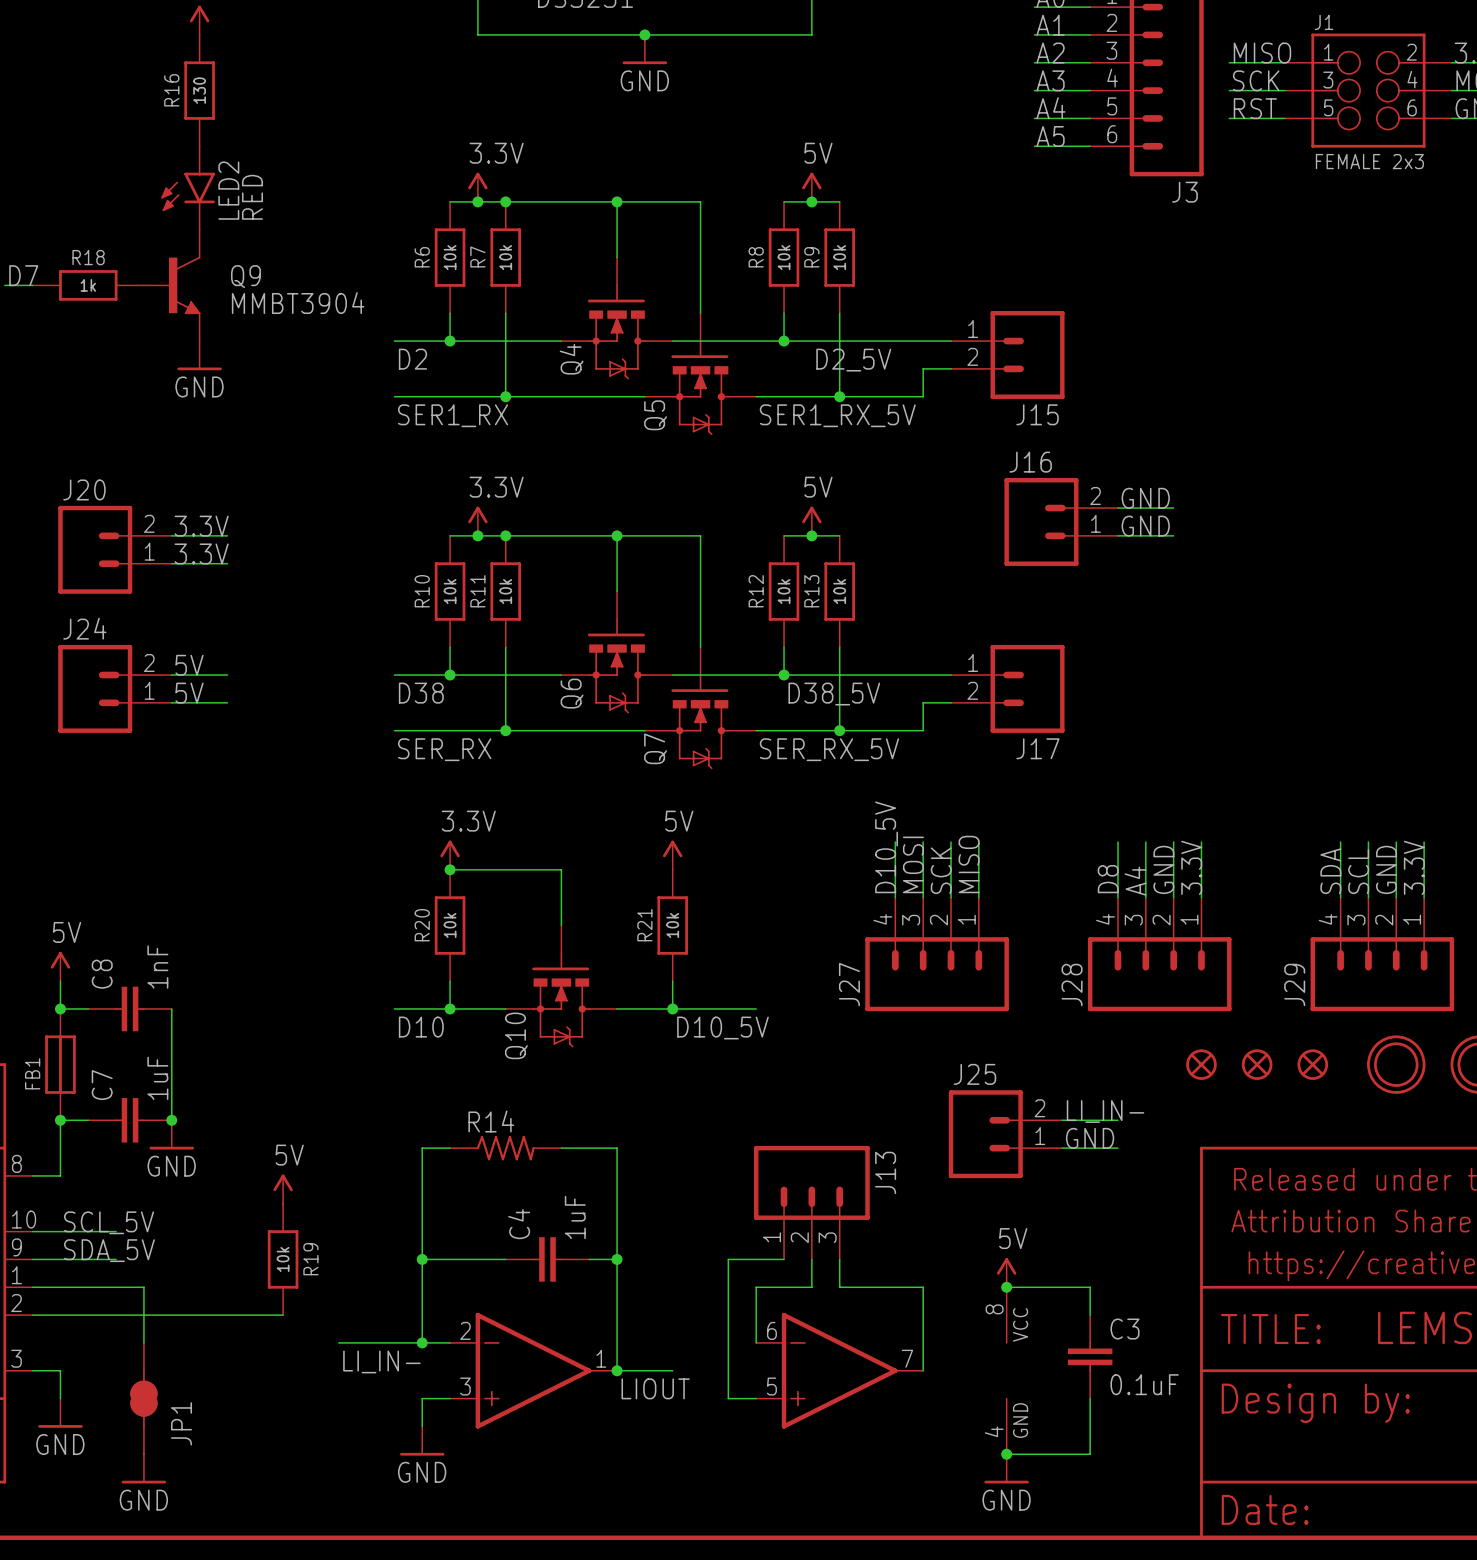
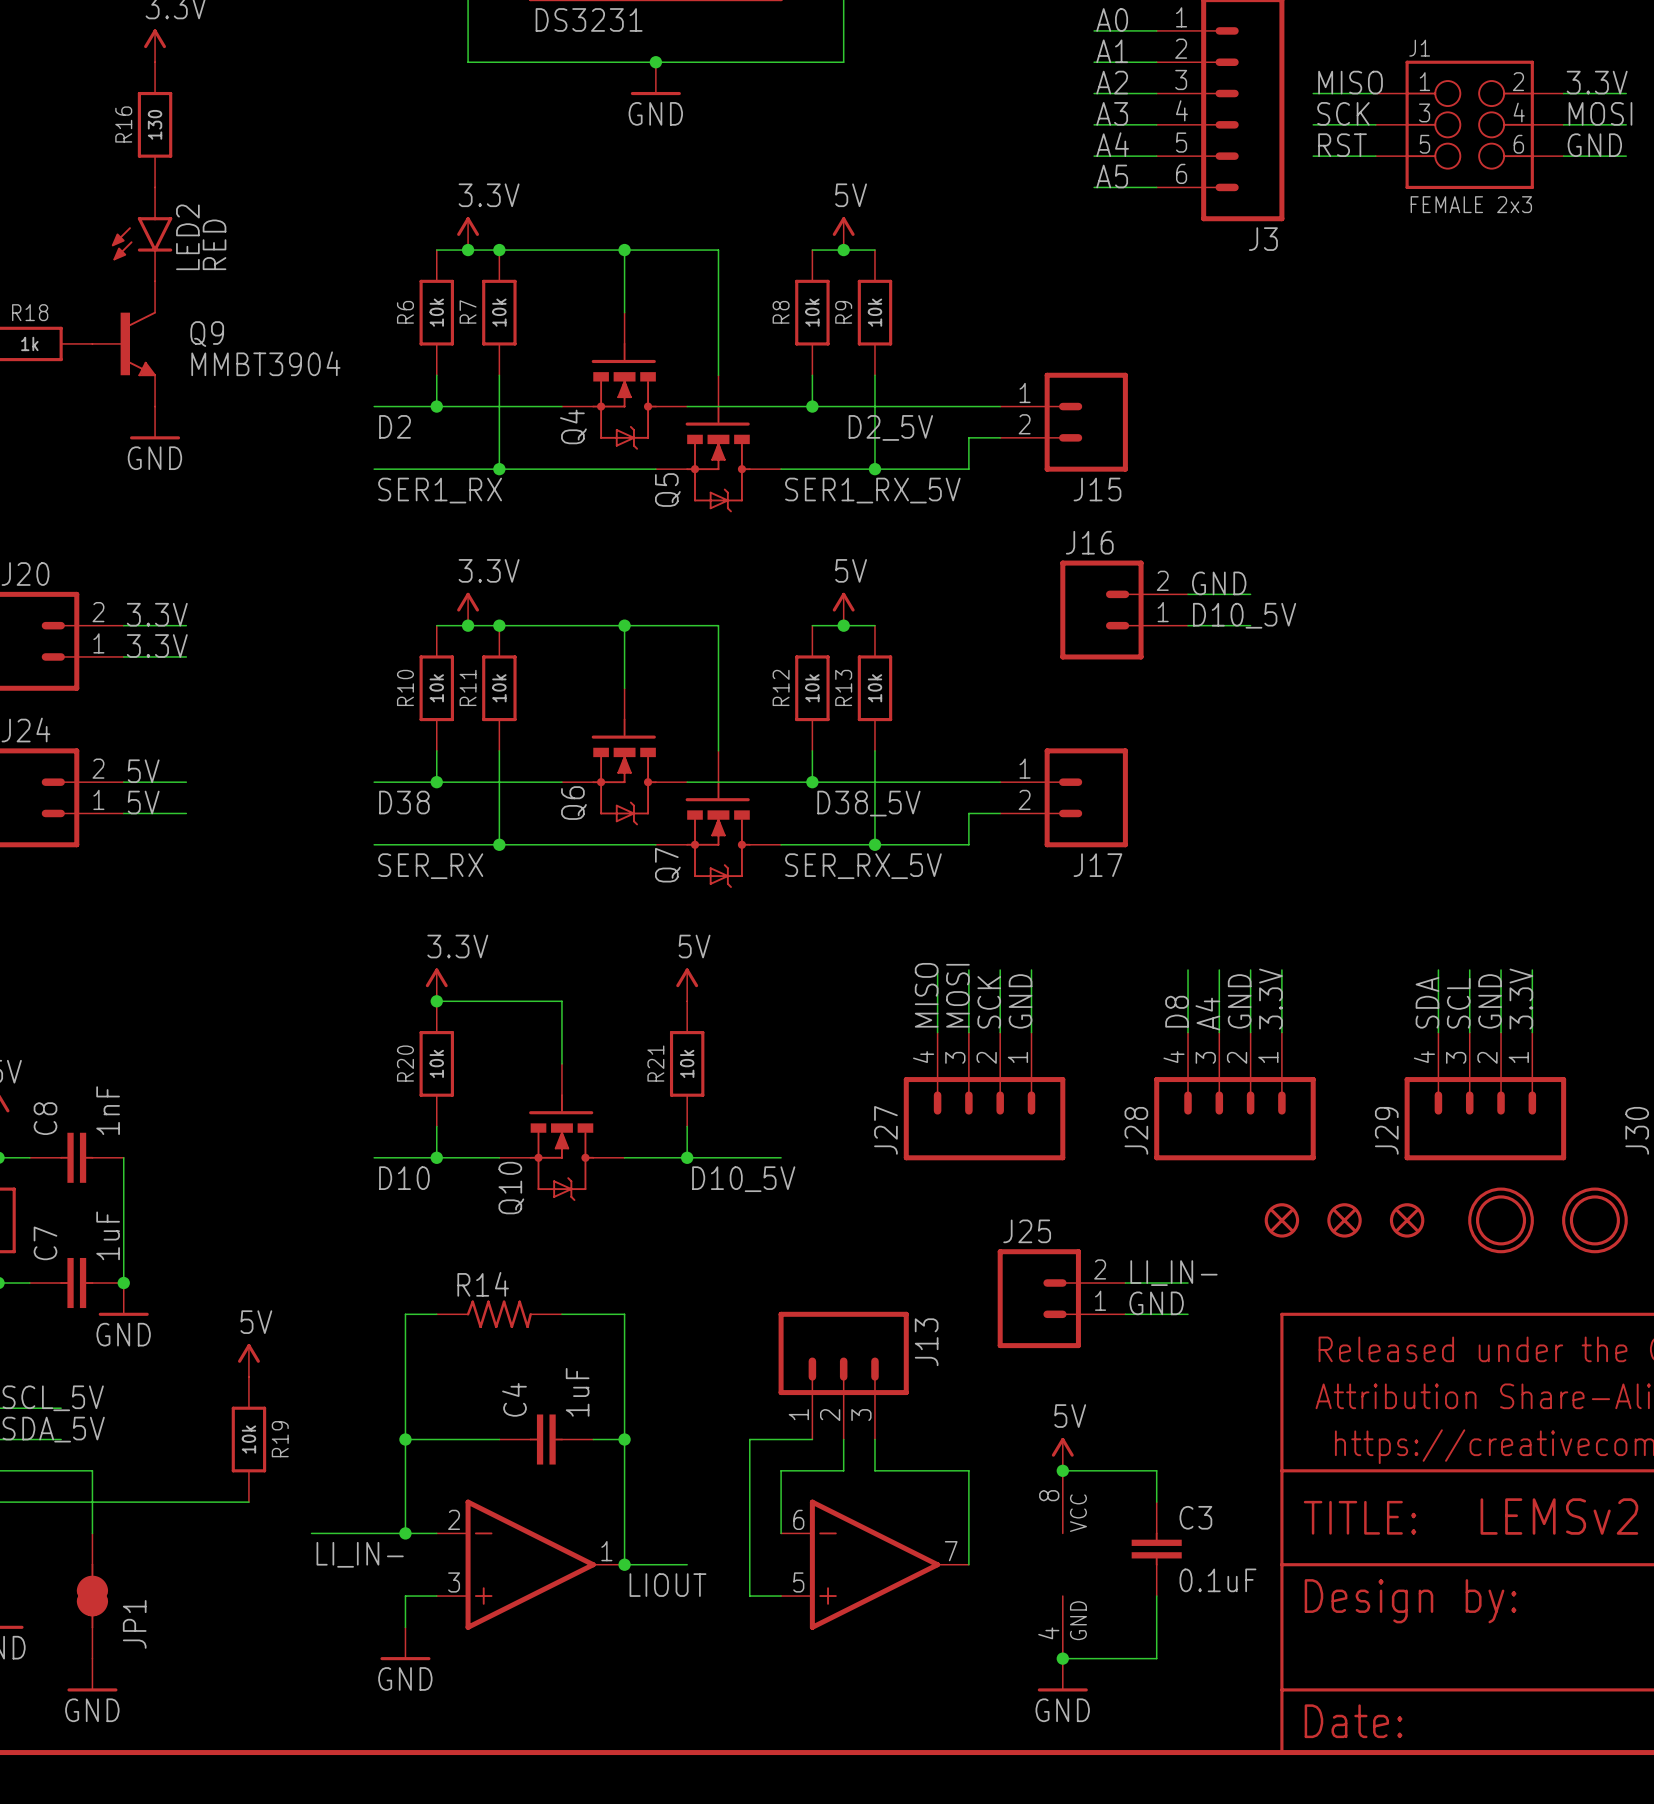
label: GND (1145, 526) -> D10_5V (1244, 615)
label: D10_5V (886, 847) -> MISO (926, 995)
label: MISO (969, 864) -> GND (1020, 1001)

